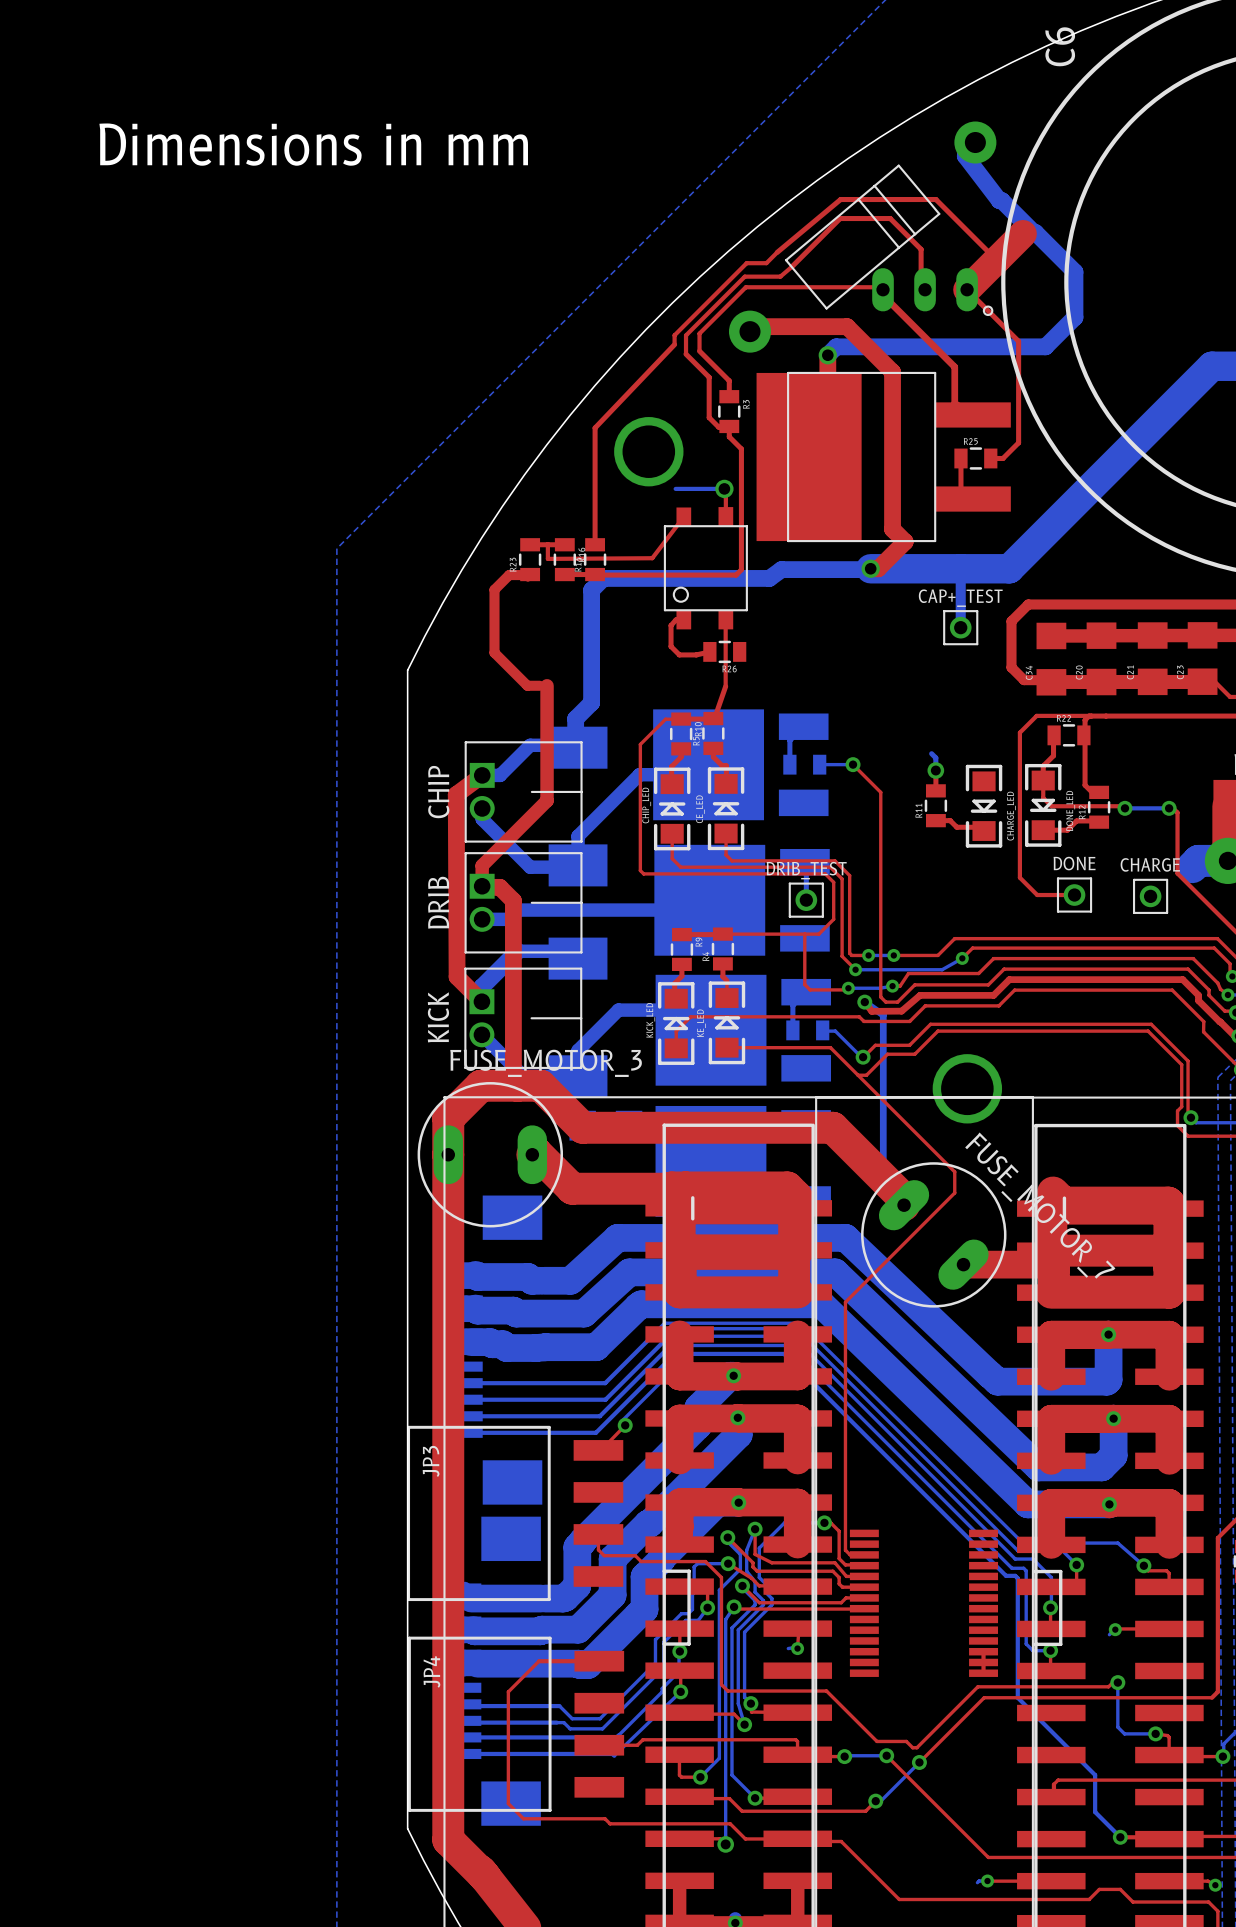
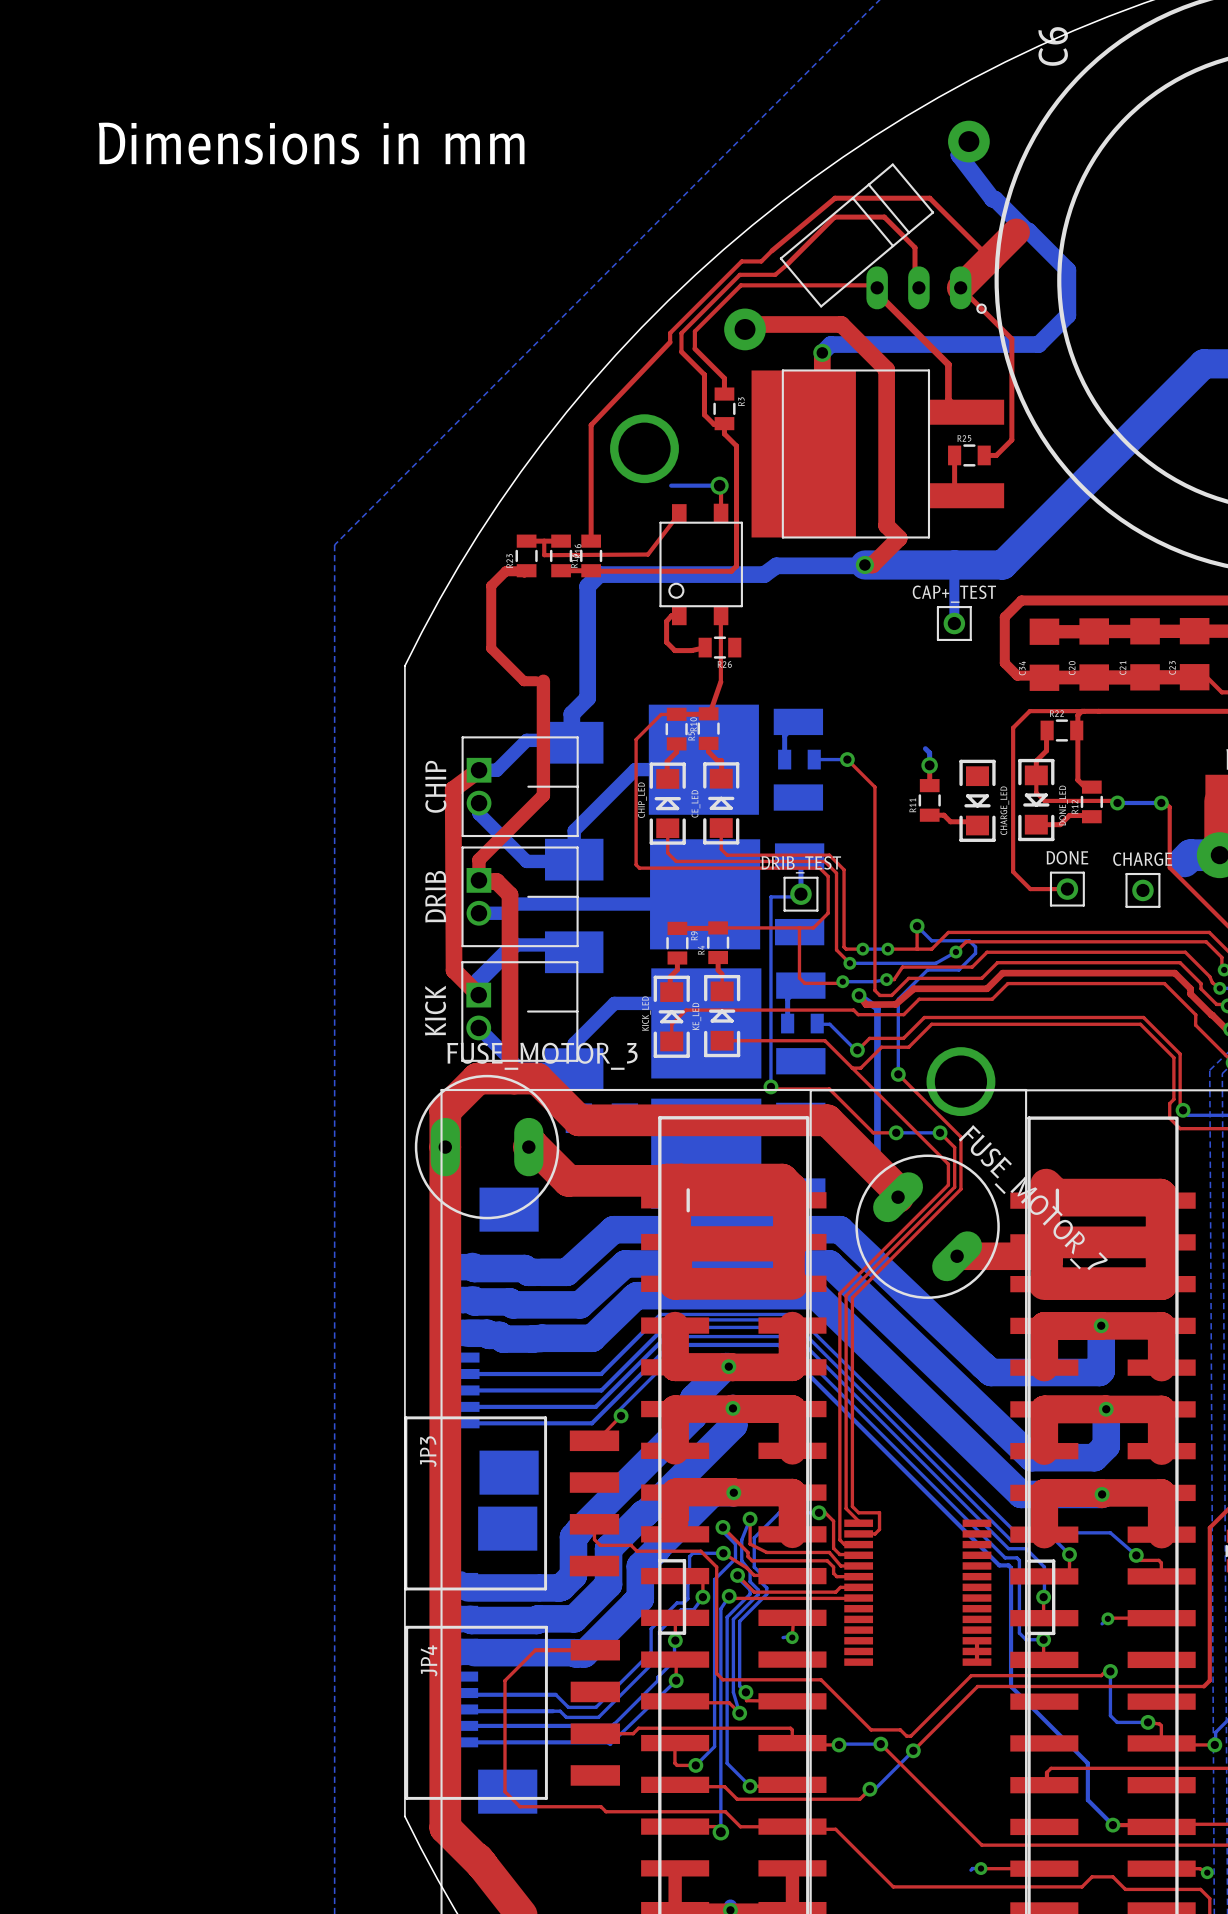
bottom track: none -> (800, 894) (798, 896) (770, 896) (770, 1086)
top track: none -> (917, 926) (917, 949)
bottom track: none -> (917, 926) (931, 940) (969, 940) (975, 947) (975, 953) (958, 970) (927, 970) (898, 999) (898, 1074)
via: none -> (917, 926)
top track: none -> (898, 1074) (960, 1137) (960, 1189) (852, 1297) (852, 1506) (858, 1512) (879, 1512) (879, 1529) (875, 1533) (858, 1533)
via: none -> (898, 1074)
top track: none -> (770, 1086) (773, 1089) (829, 1089) (873, 1132) (896, 1132)
via: none -> (770, 1086)
bottom track: none -> (896, 1132) (940, 1132)
via: none -> (896, 1132)
top track: none -> (940, 1132) (954, 1147) (954, 1187) (846, 1295) (846, 1508) (858, 1523)
via: none -> (940, 1132)

